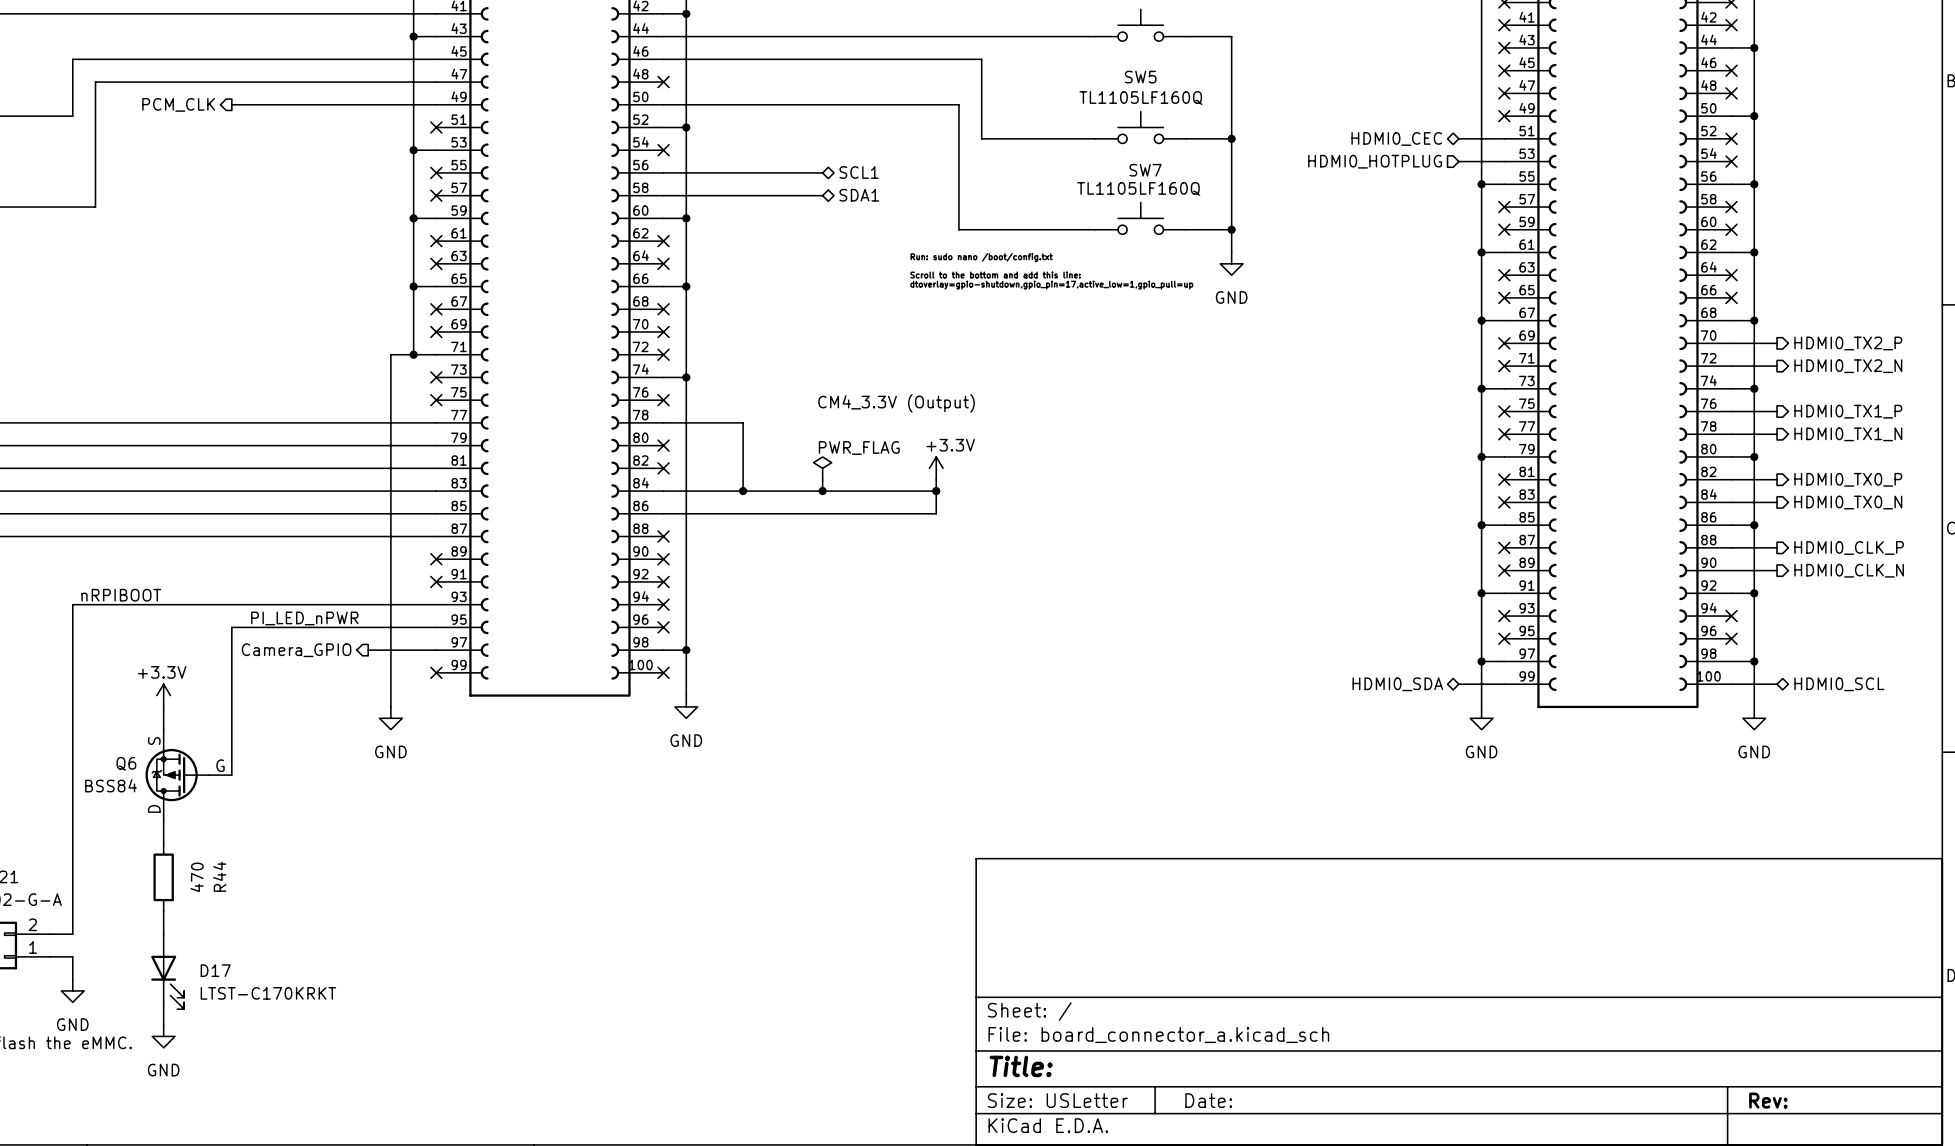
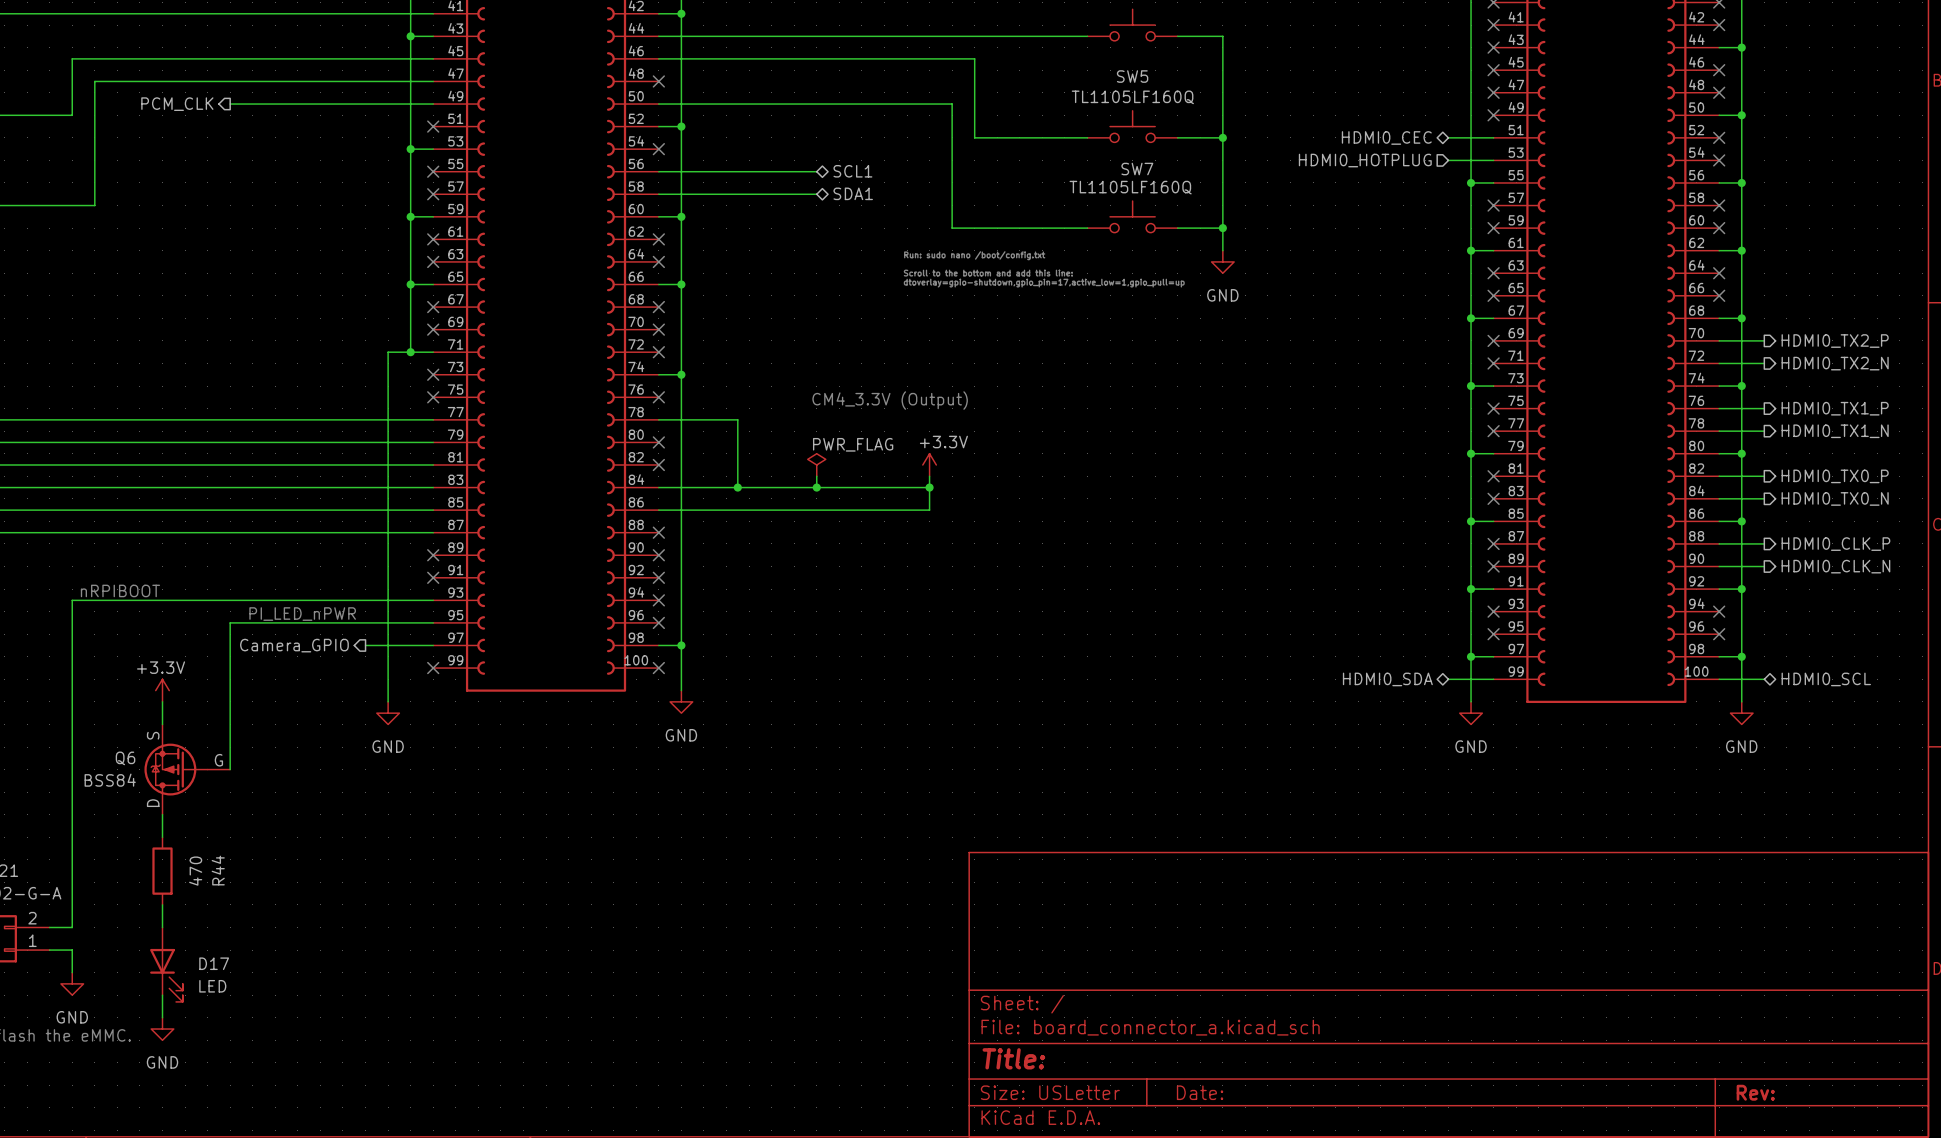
D17 value: LTST-C170KRKT (268, 993) -> LED (212, 986)

